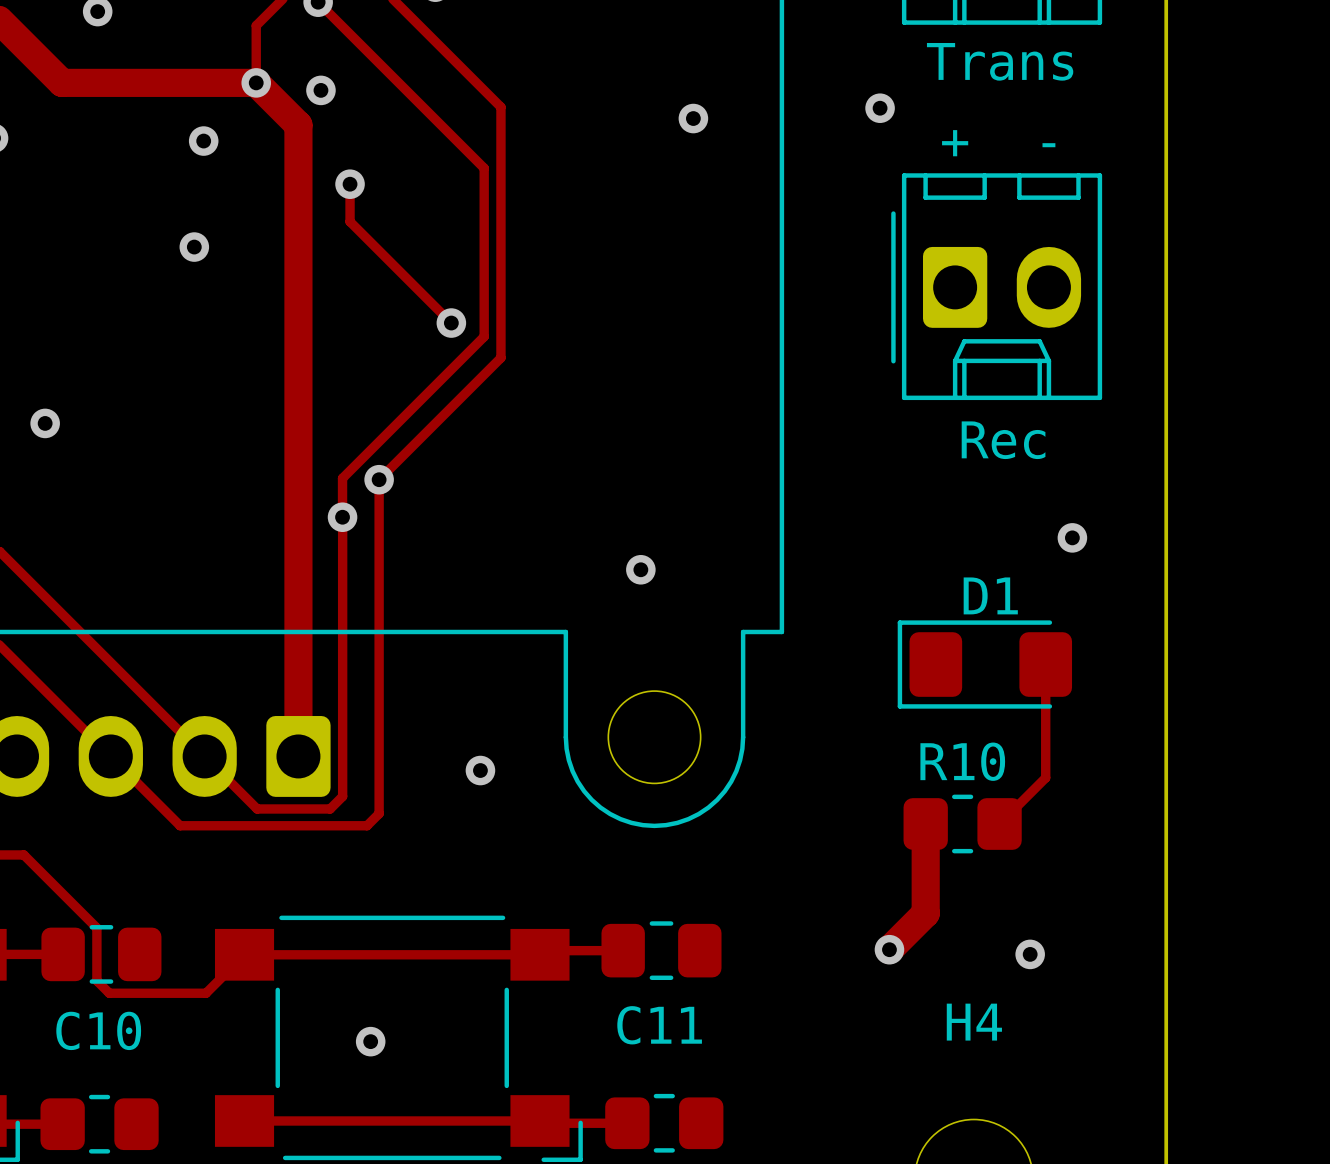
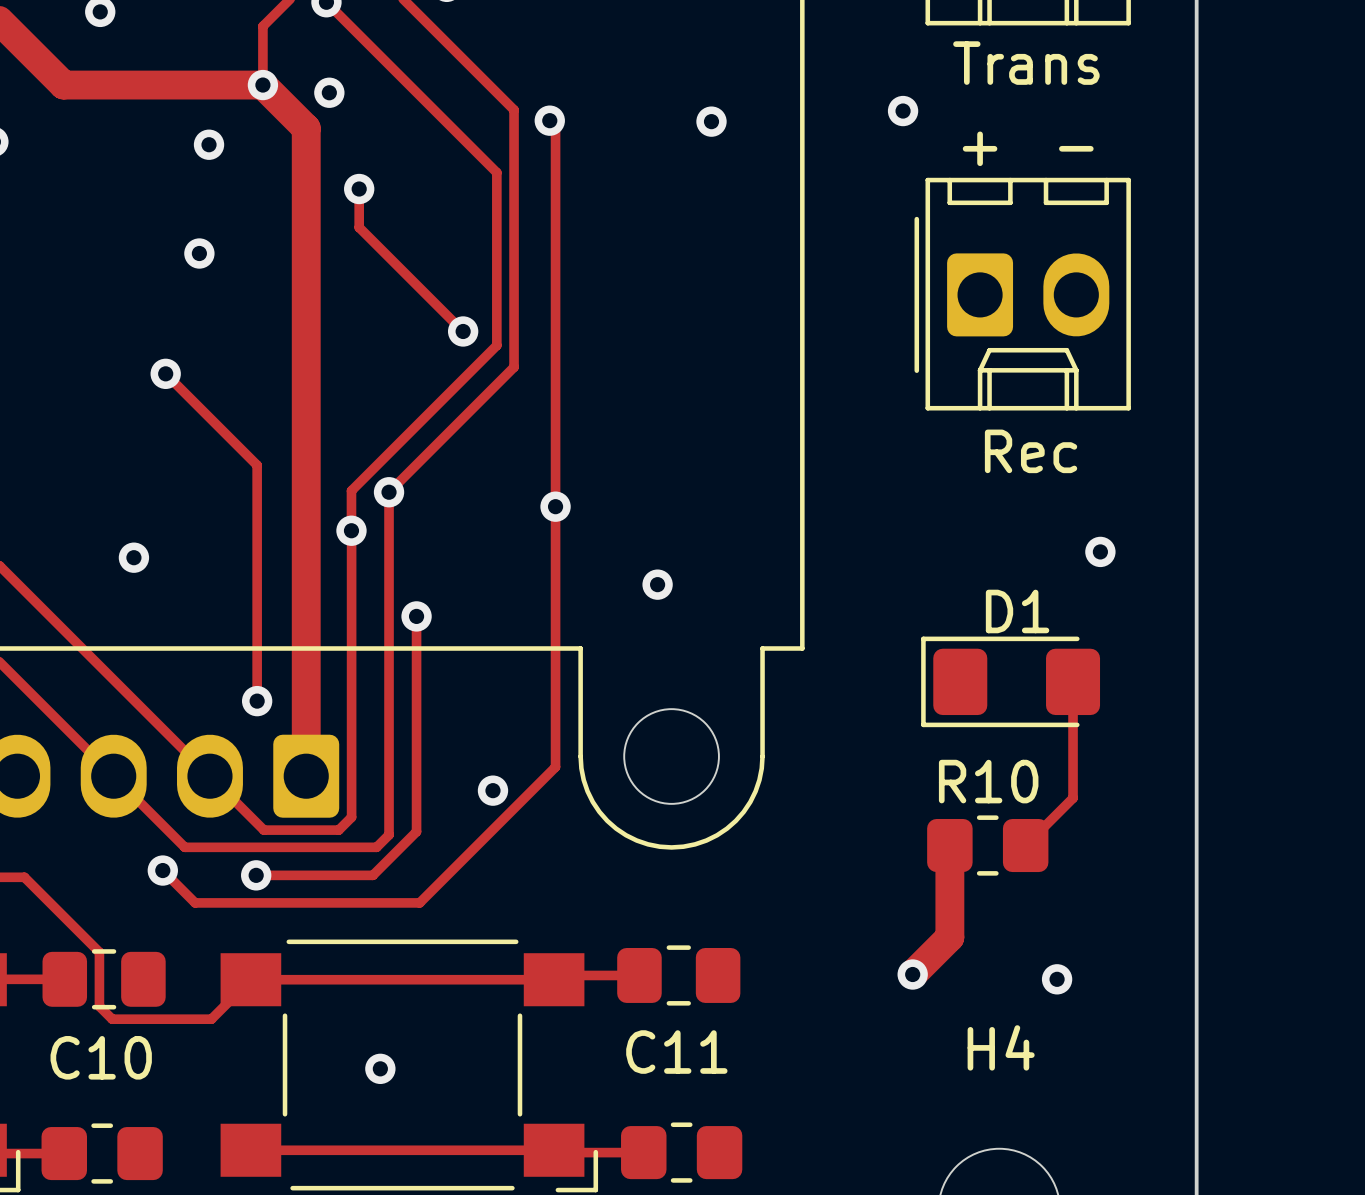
track: none -> (549, 120) (555, 126) (555, 767) (419, 902) (195, 902) (162, 870)
via: none -> (549, 120)
track: none -> (165, 373) (257, 465) (257, 701)
via: none -> (165, 373)
via: (45, 423) -> none
via: none -> (555, 506)
via: none -> (133, 557)
track: none -> (416, 616) (416, 831) (372, 875) (256, 875)
via: none -> (416, 616)
via: none -> (257, 701)
via: none -> (162, 870)
via: none -> (256, 875)

